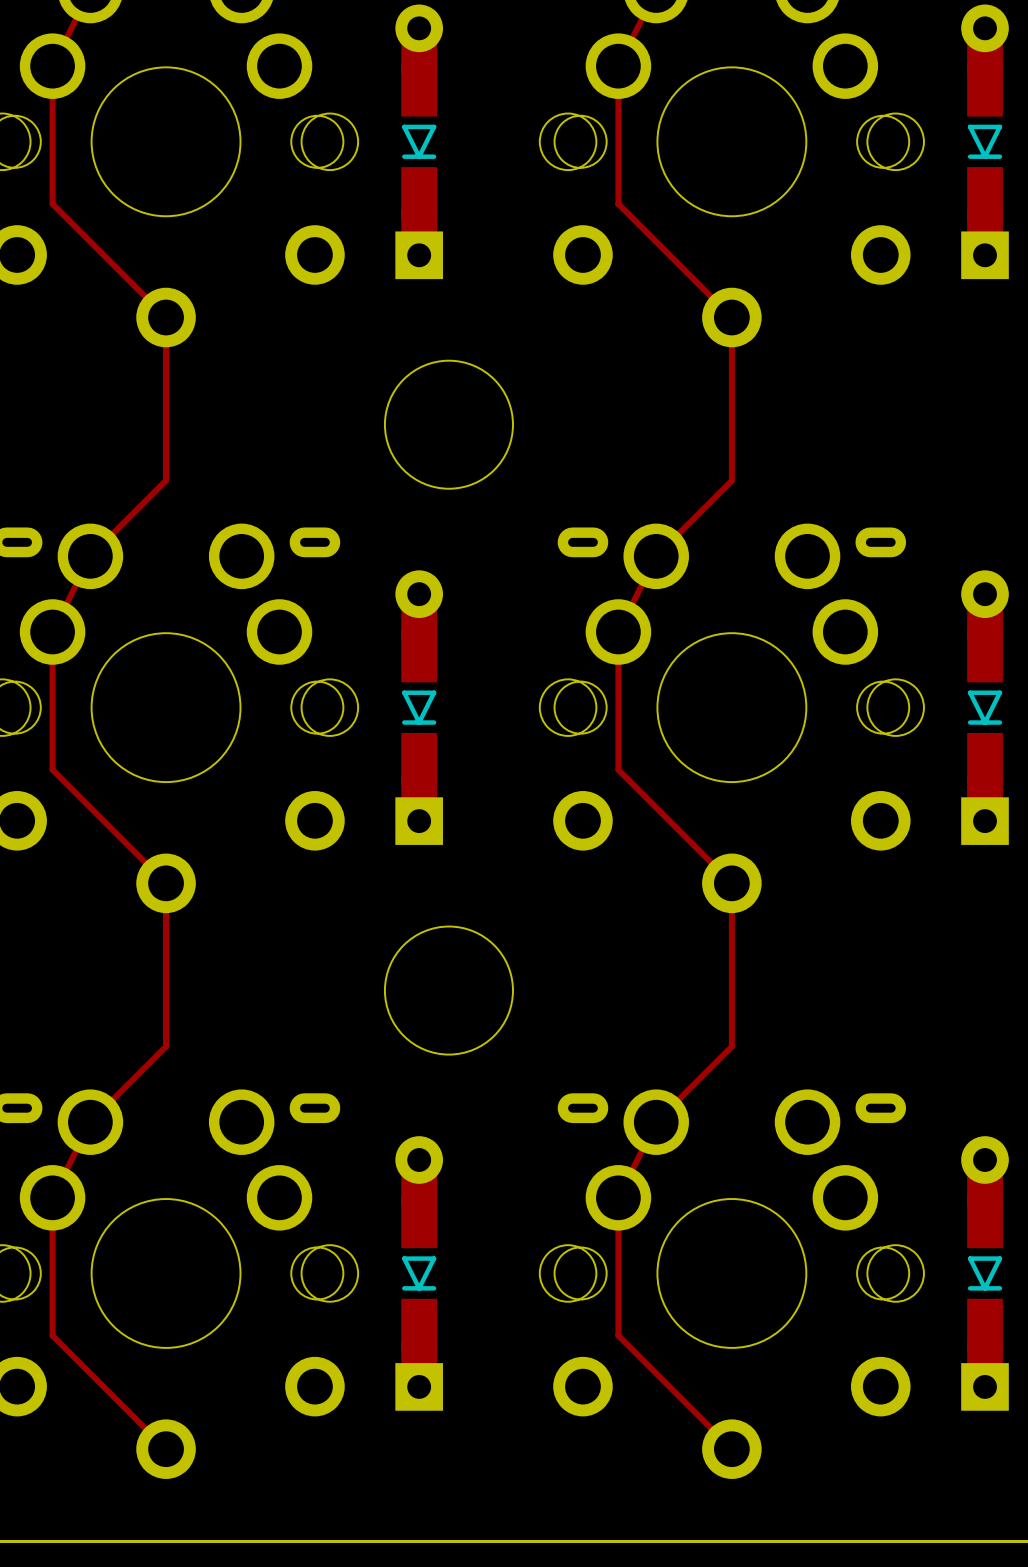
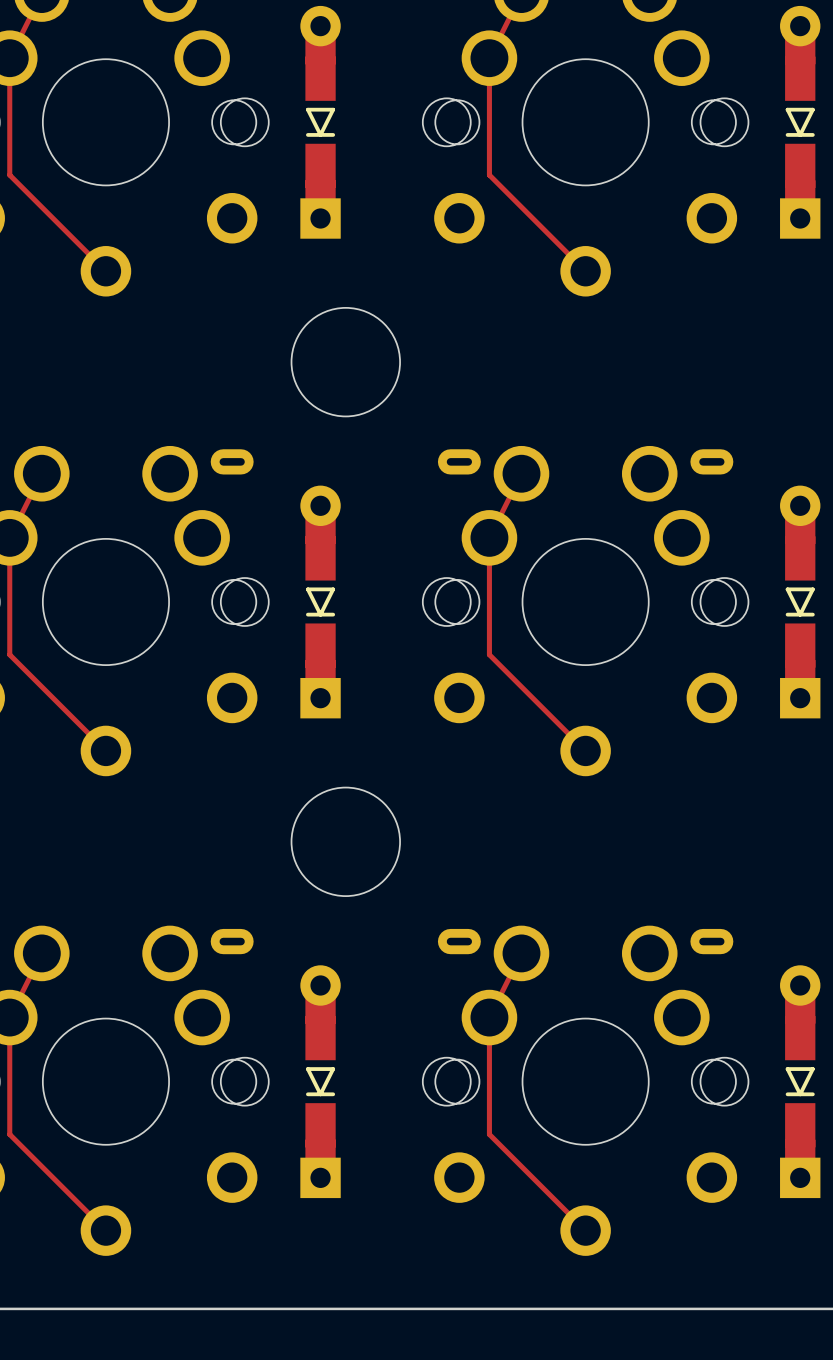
track: (166, 317) (166, 480) (90, 556) -> none
track: (731, 317) (731, 480) (656, 556) -> none
track: (166, 883) (166, 1046) (90, 1122) -> none
track: (731, 883) (731, 1046) (656, 1122) -> none

